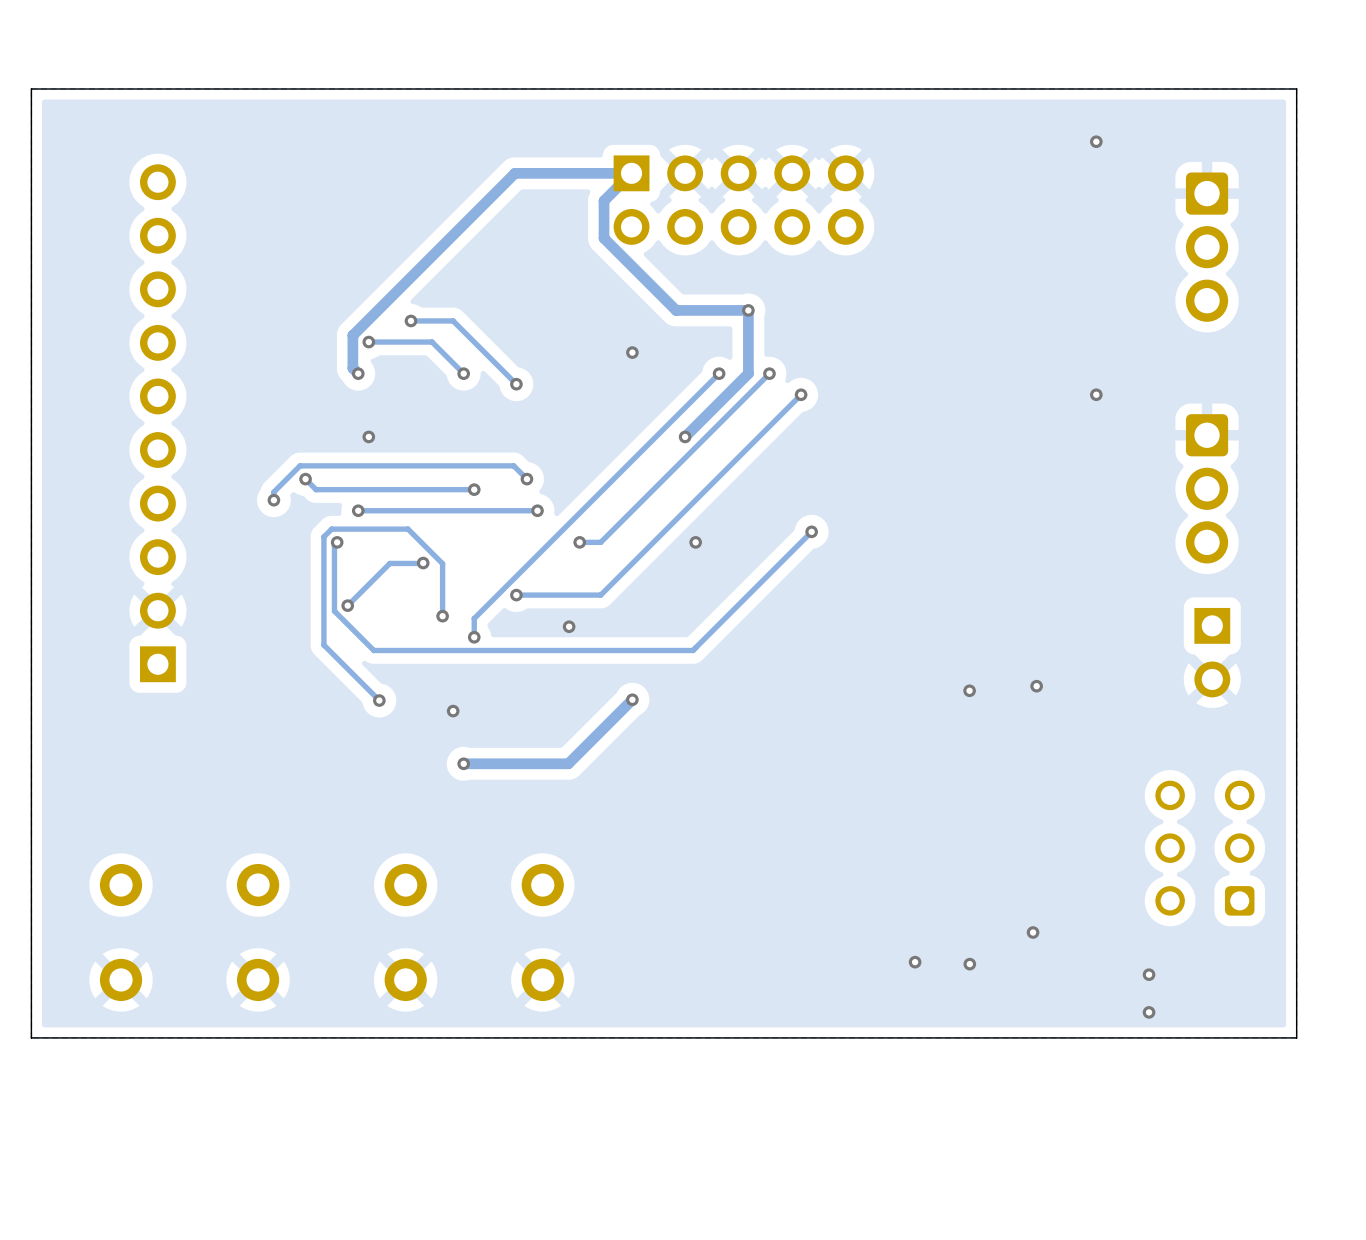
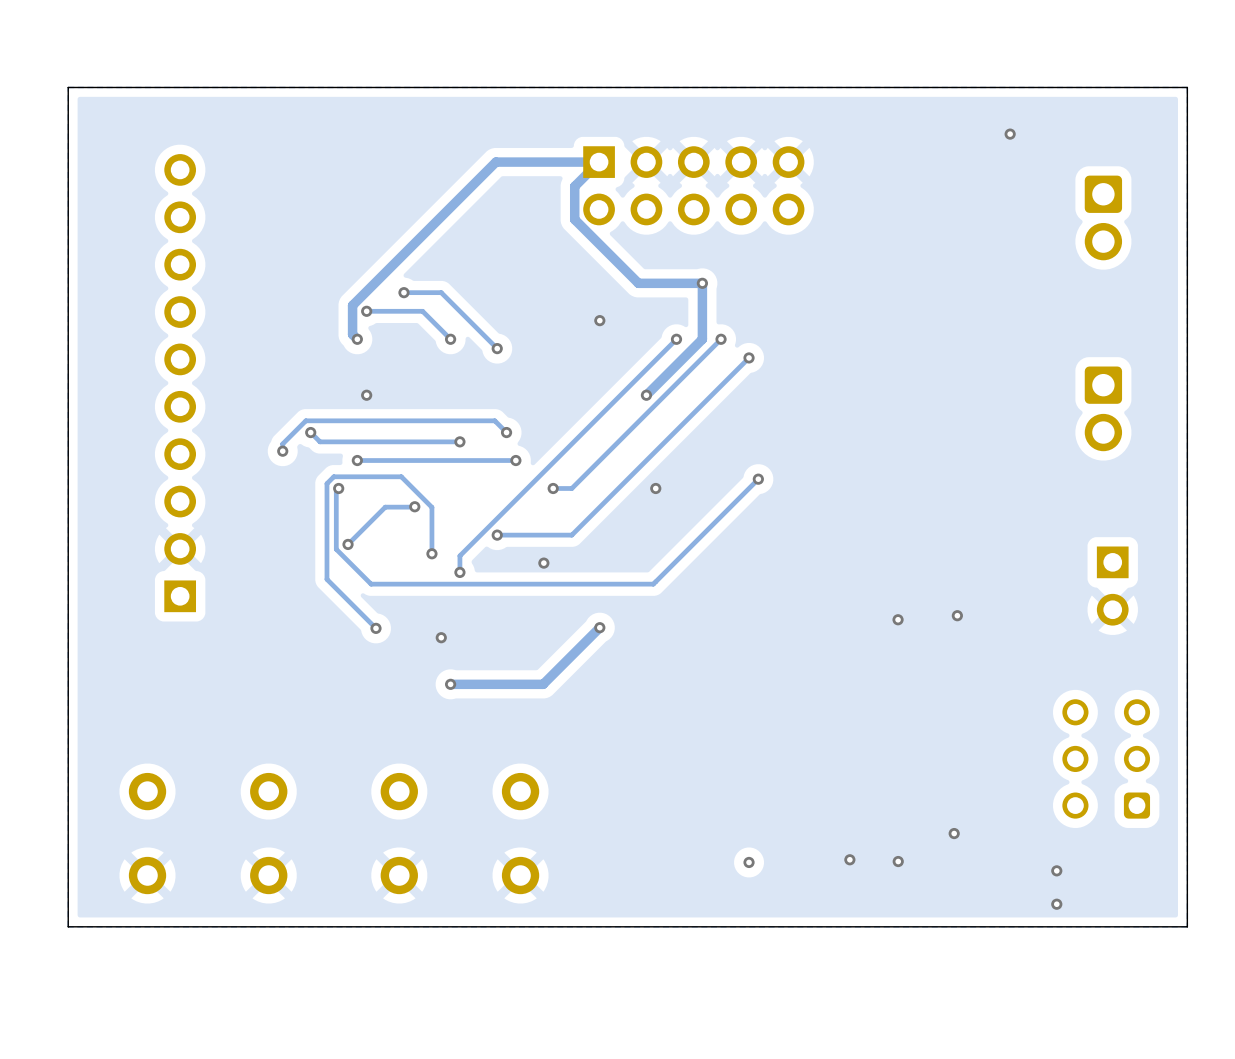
part footprint: [1185, 172, 1229, 322] -> [1084, 175, 1123, 261]
via: (1096, 394) -> none
part: none -> (1103, 408)
part: (1207, 488) -> none
via: none -> (749, 862)

